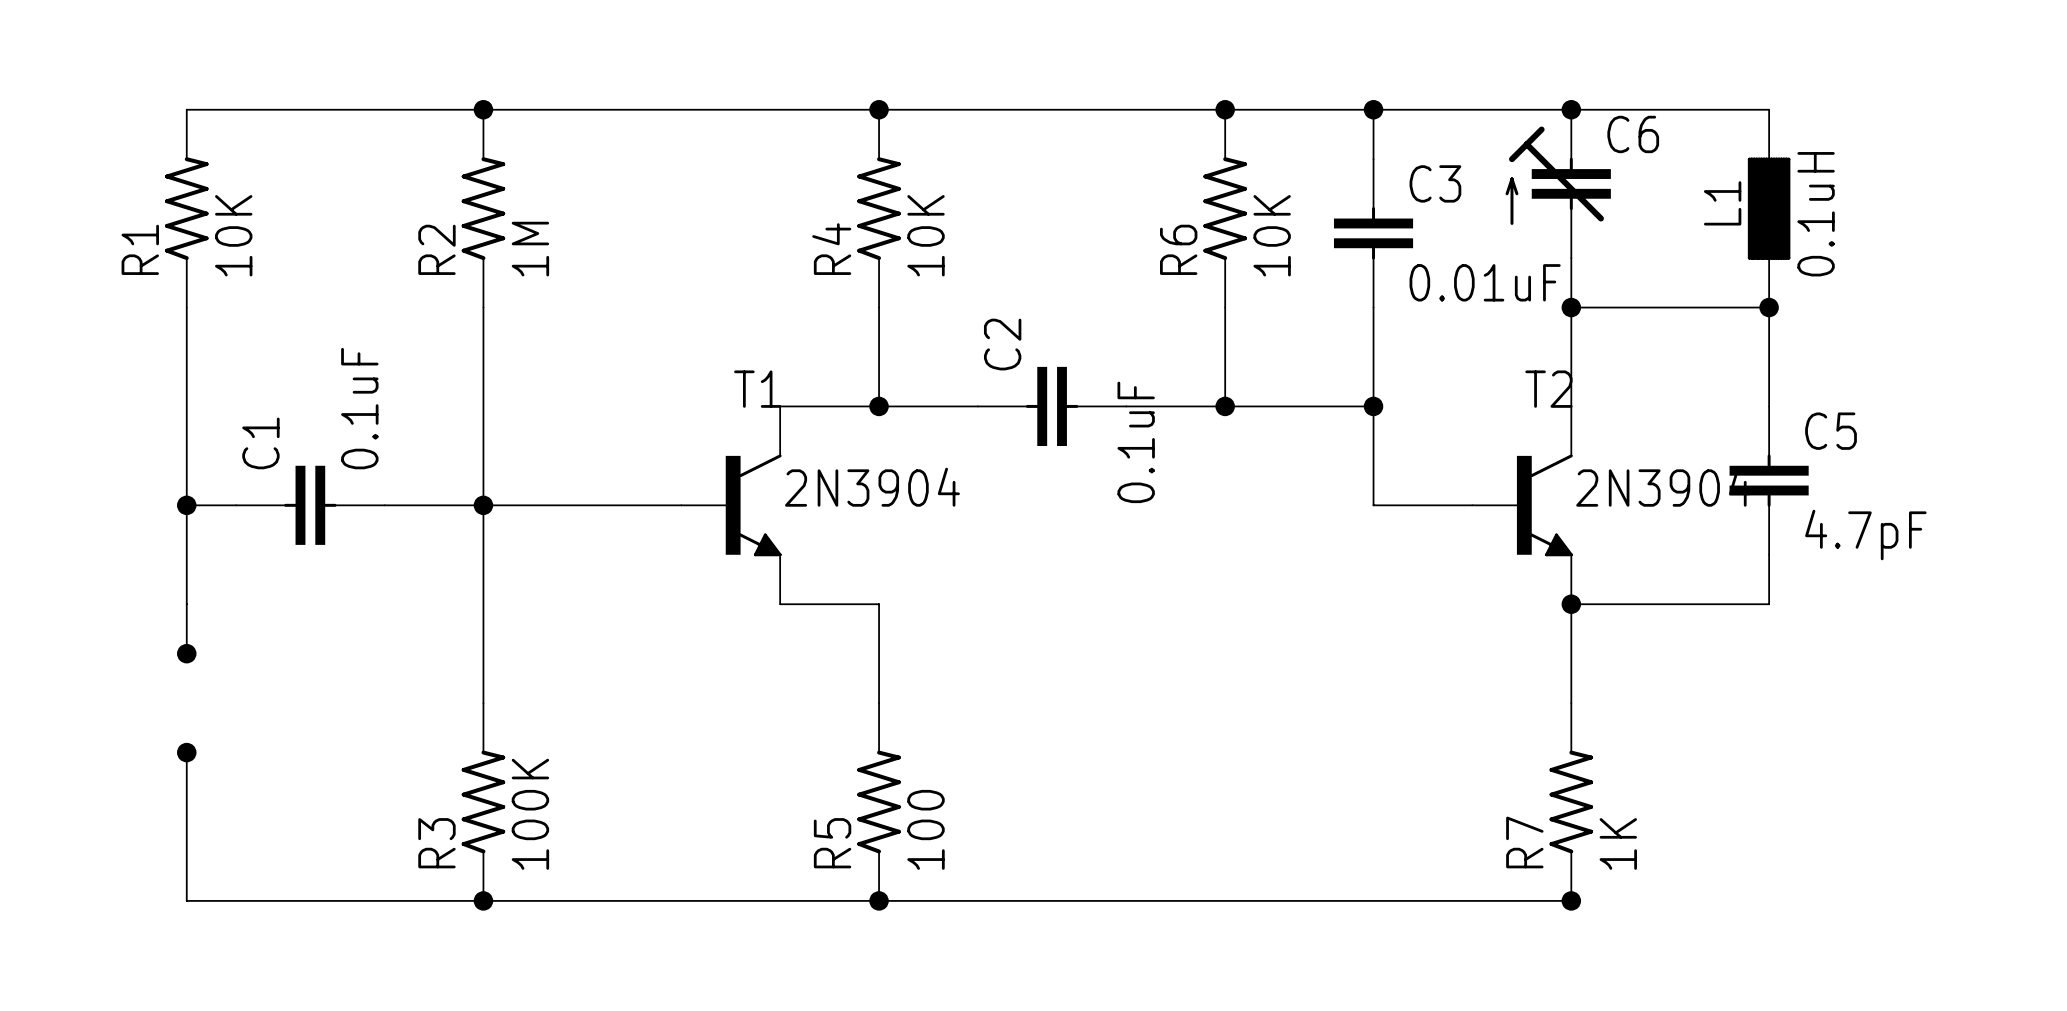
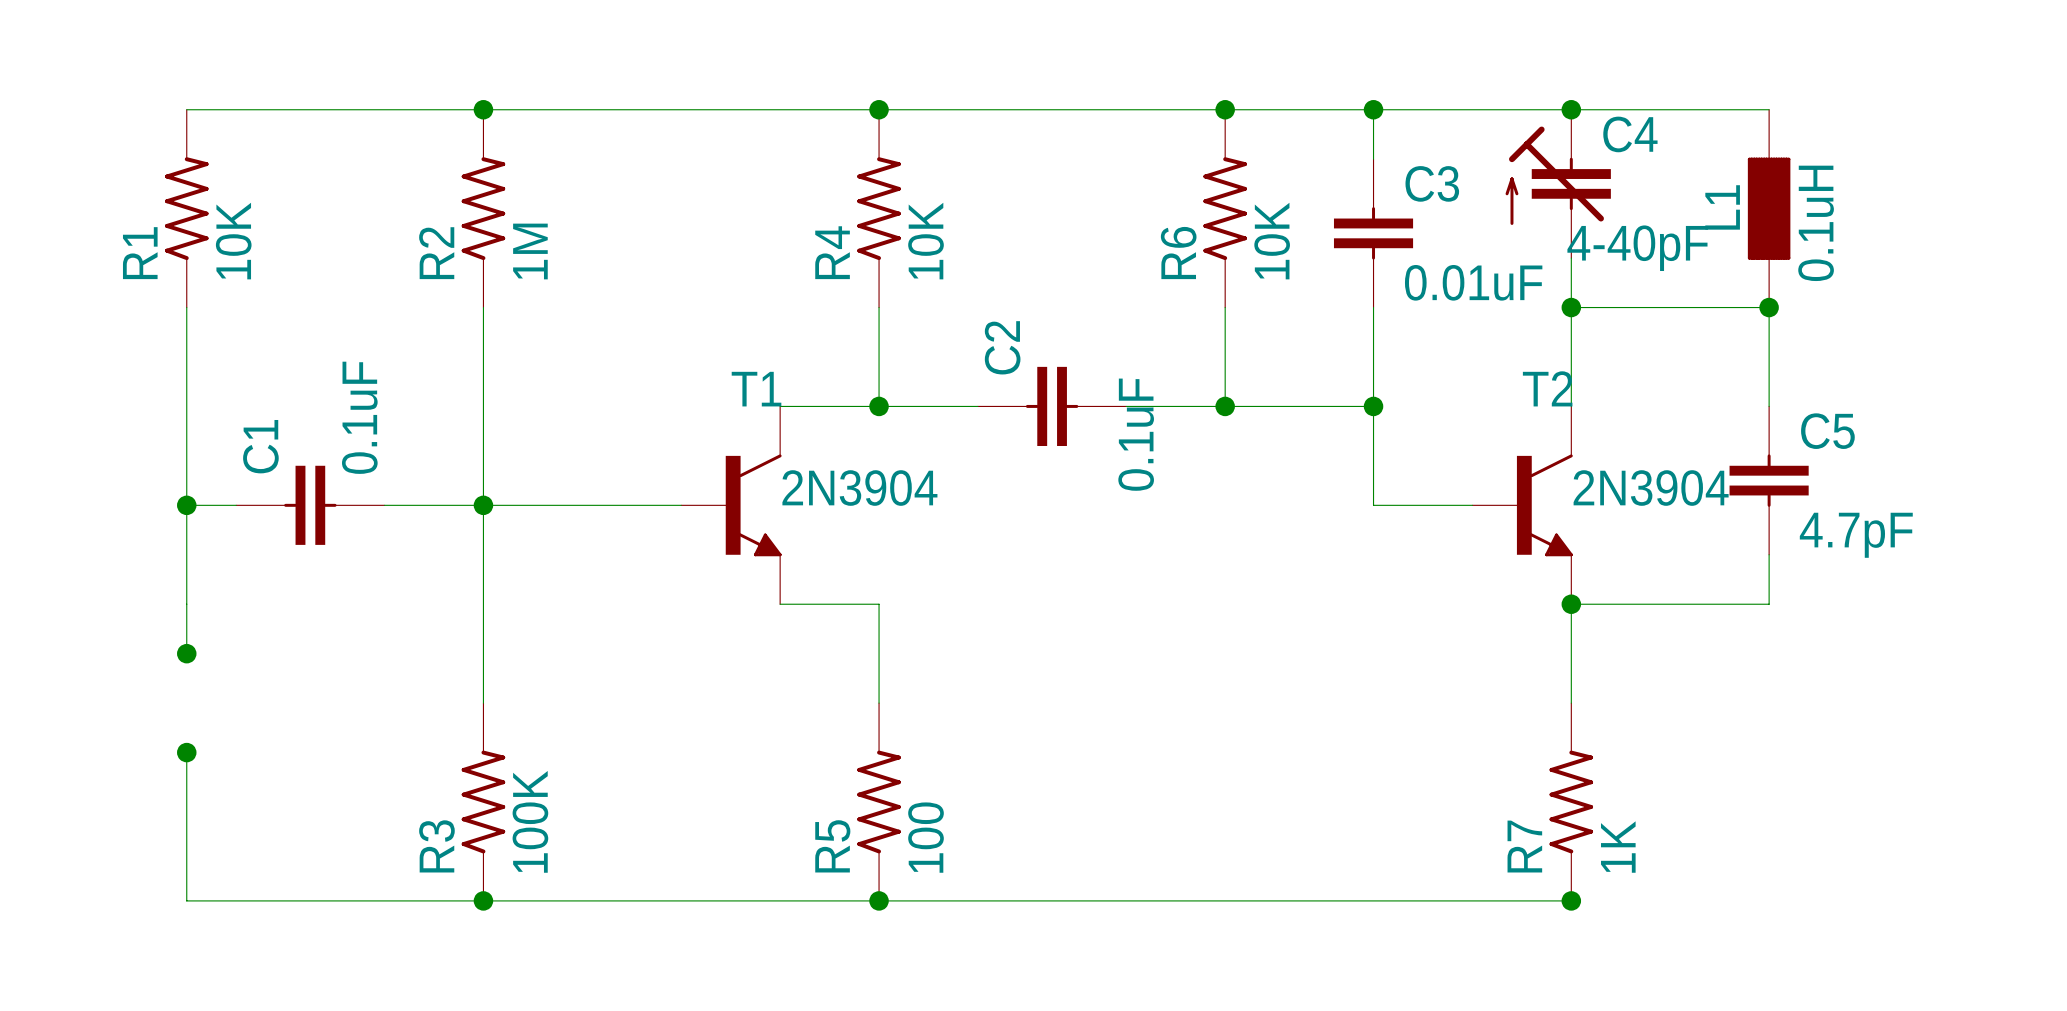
C6 name: C6 (1633, 134) -> C4 (1630, 134)
C6 value: none -> 4-40pF (1637, 248)

